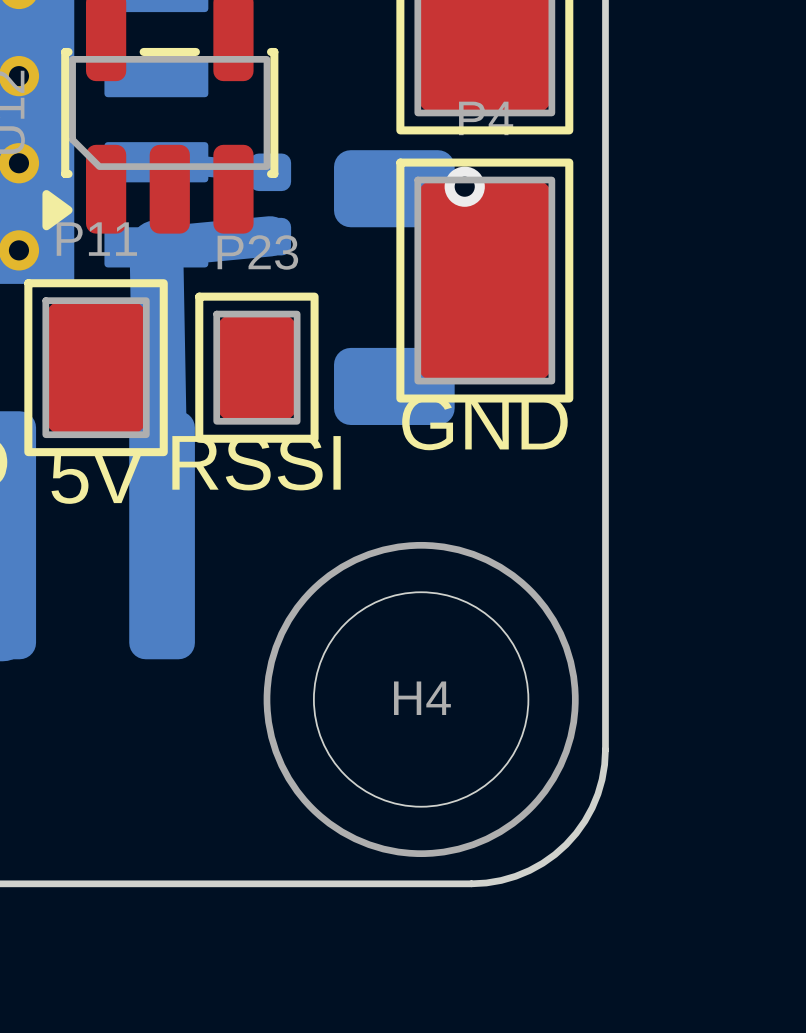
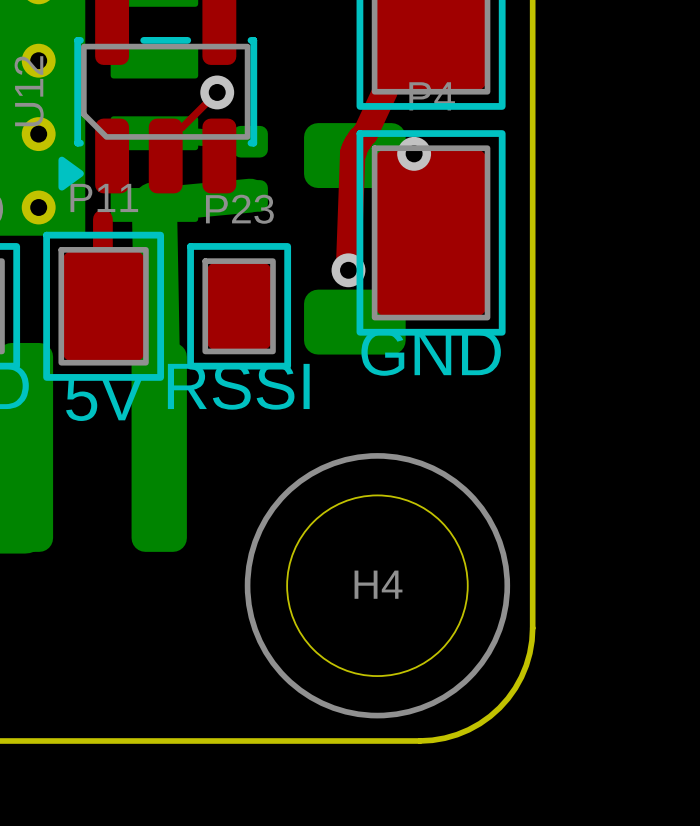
top track: none -> (385, 91) (365, 133) (356, 143) (352, 153) (348, 270)
top track: none -> (217, 92) (181, 127)
via: none -> (217, 92)
top track: none -> (102, 219) (102, 250)
via: none -> (348, 270)

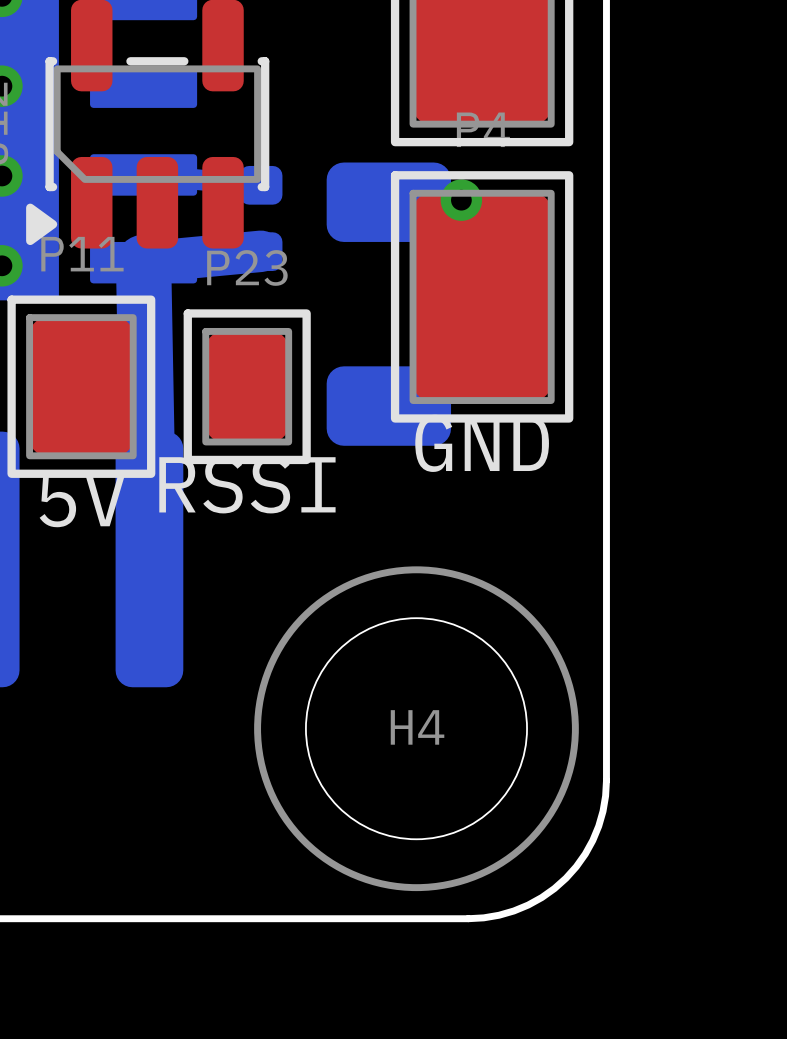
top track: (385, 91) (365, 133) (356, 143) (352, 153) (348, 270) -> none
top track: (217, 92) (181, 127) -> none
via: (217, 92) -> none
top track: (102, 219) (102, 250) -> none
via: (348, 270) -> none

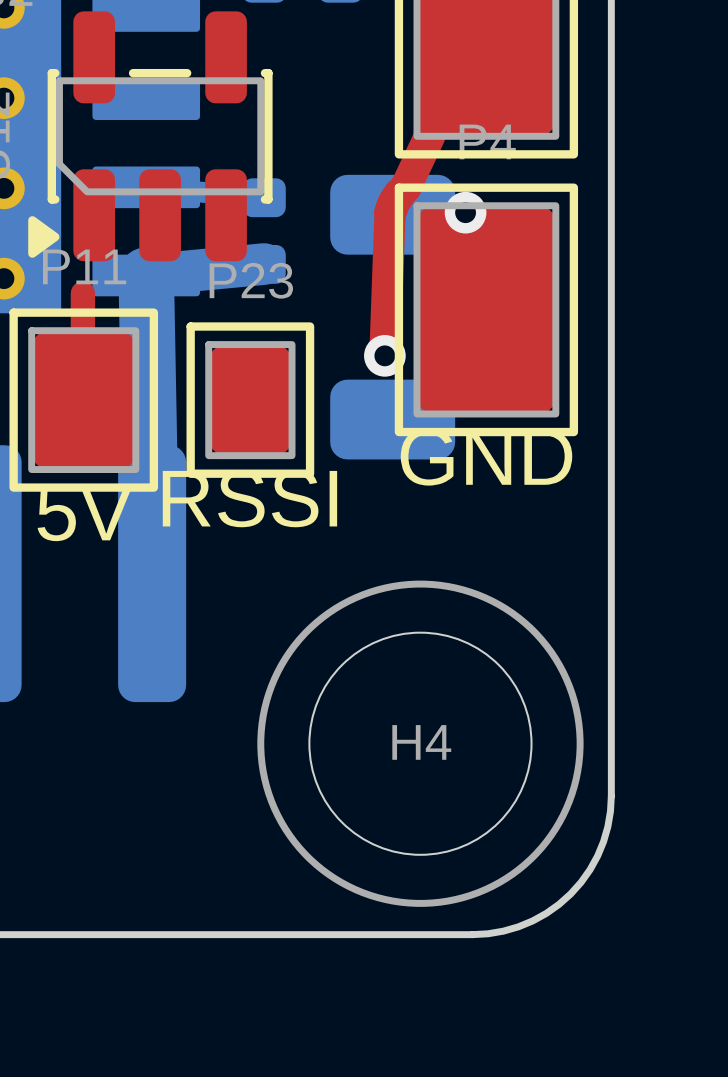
top track: none -> (429, 135) (405, 187) (395, 199) (390, 211) (384, 355)
top track: none -> (82, 293) (82, 331)
via: none -> (384, 355)

